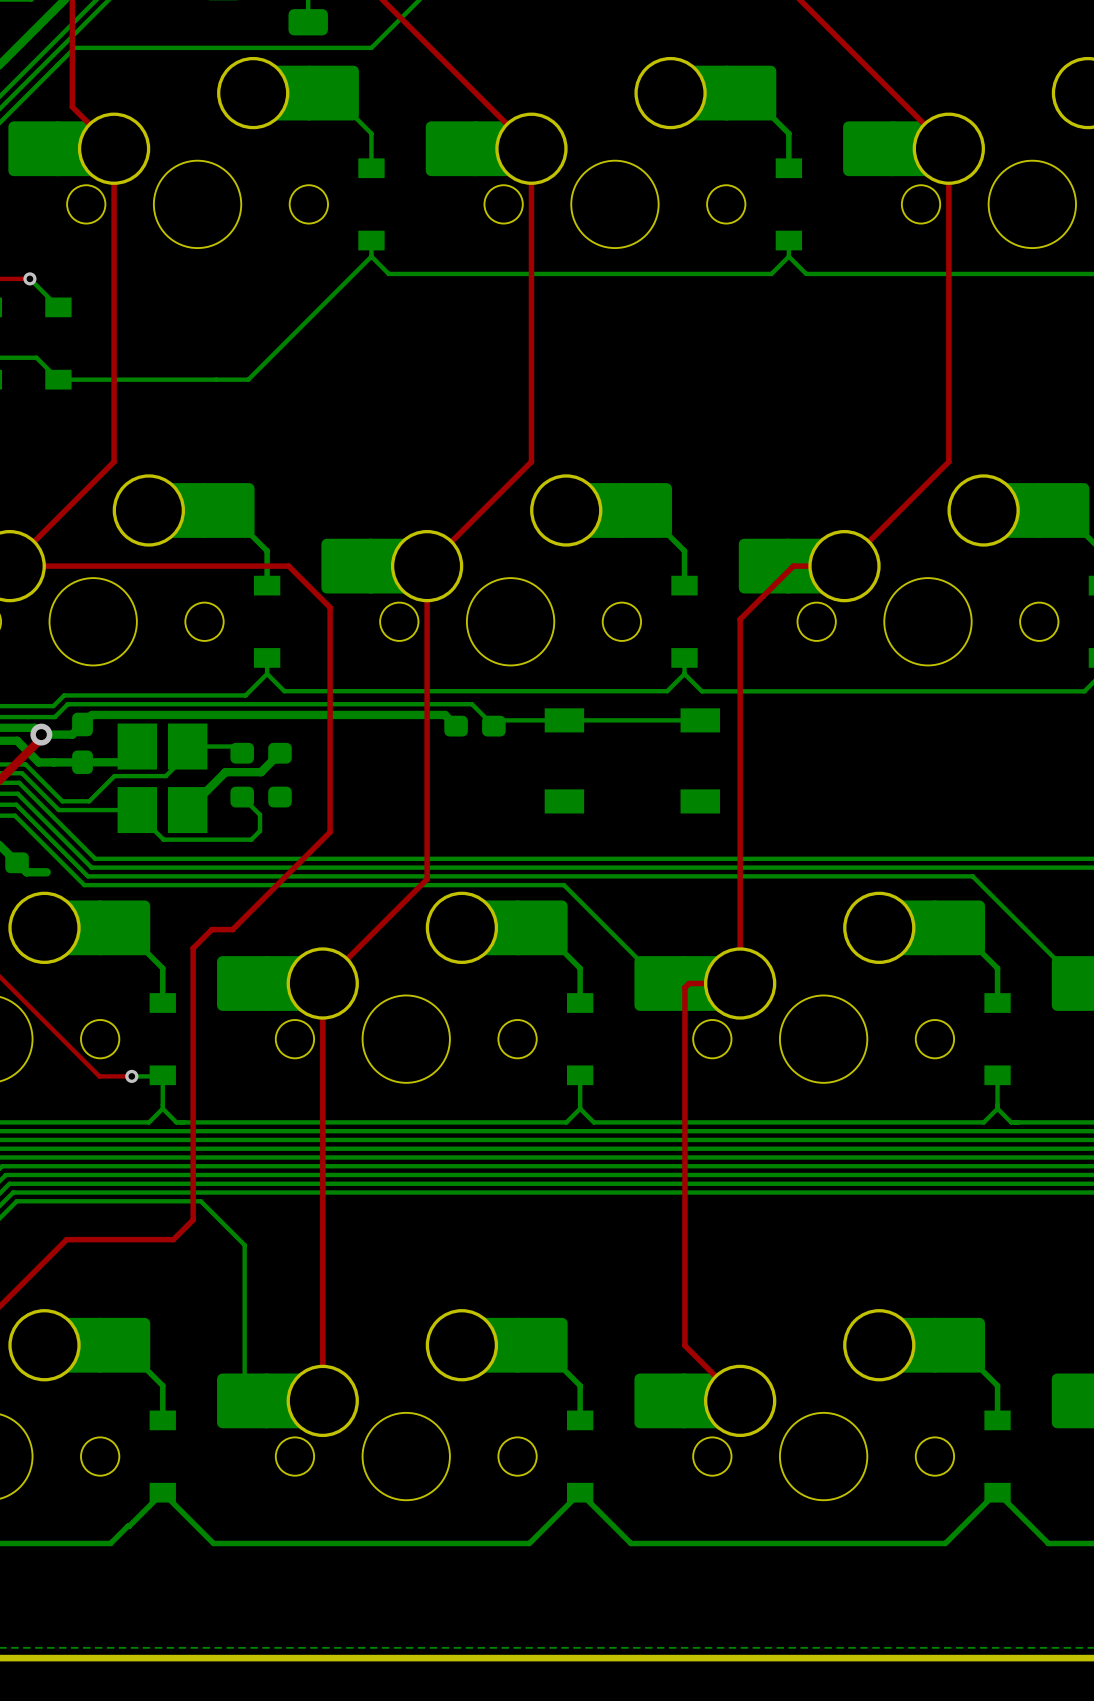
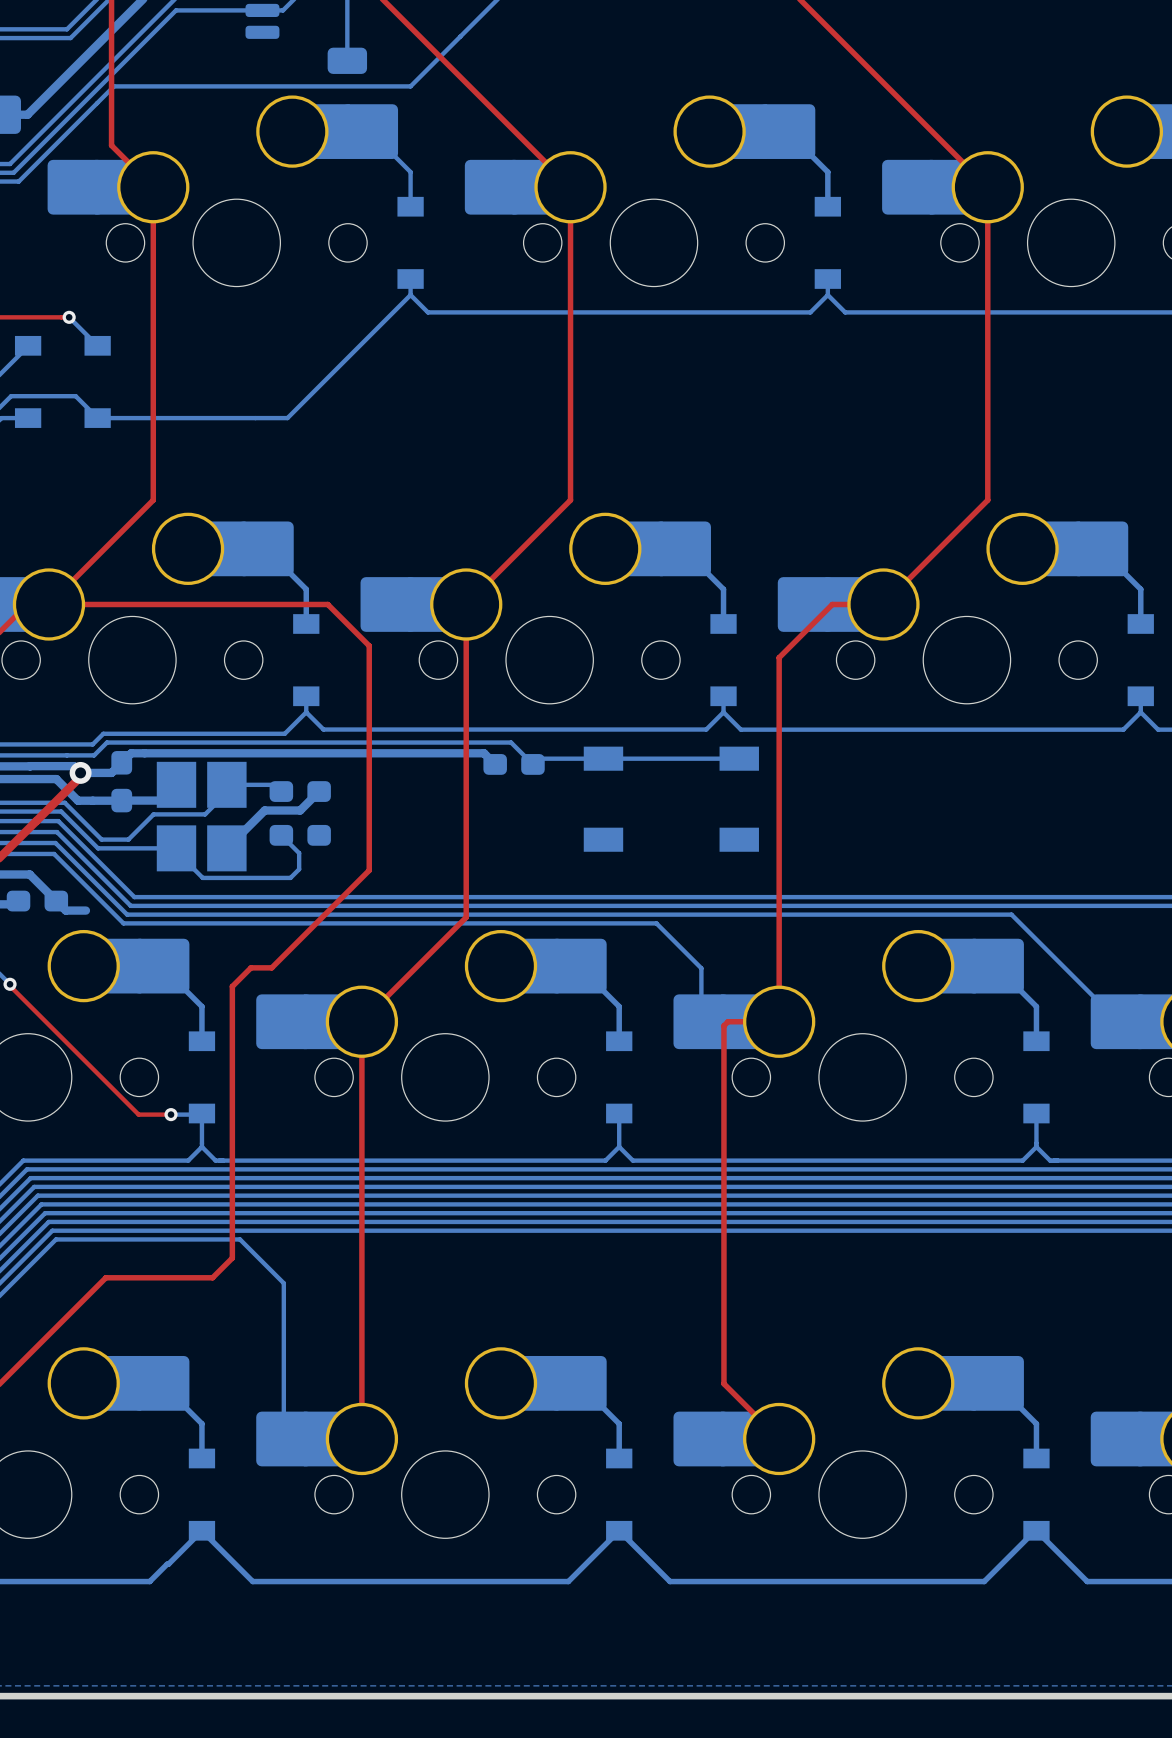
bottom track: (563, 885) (662, 983) -> (603, 923) (656, 923) (701, 968) (701, 1021)

